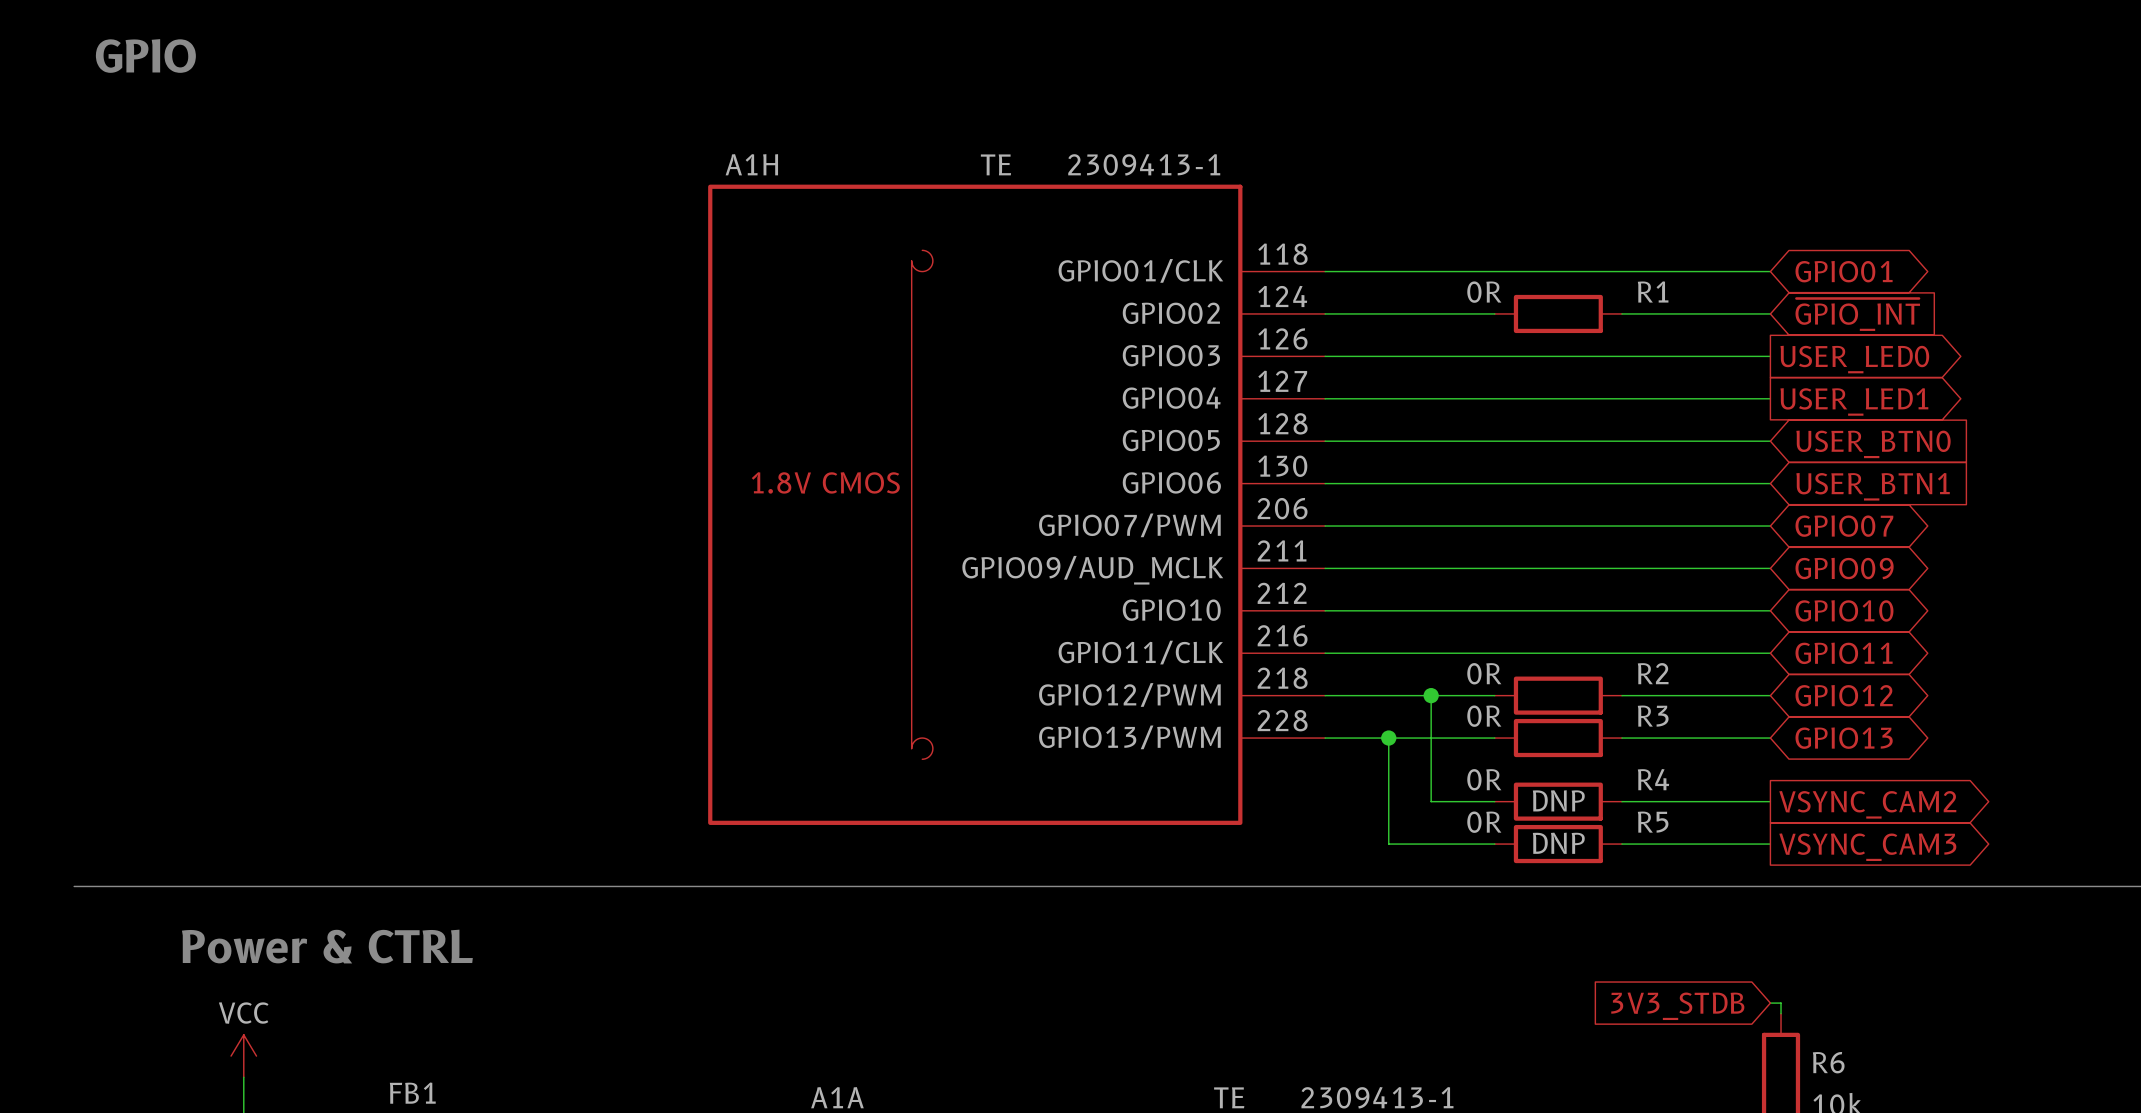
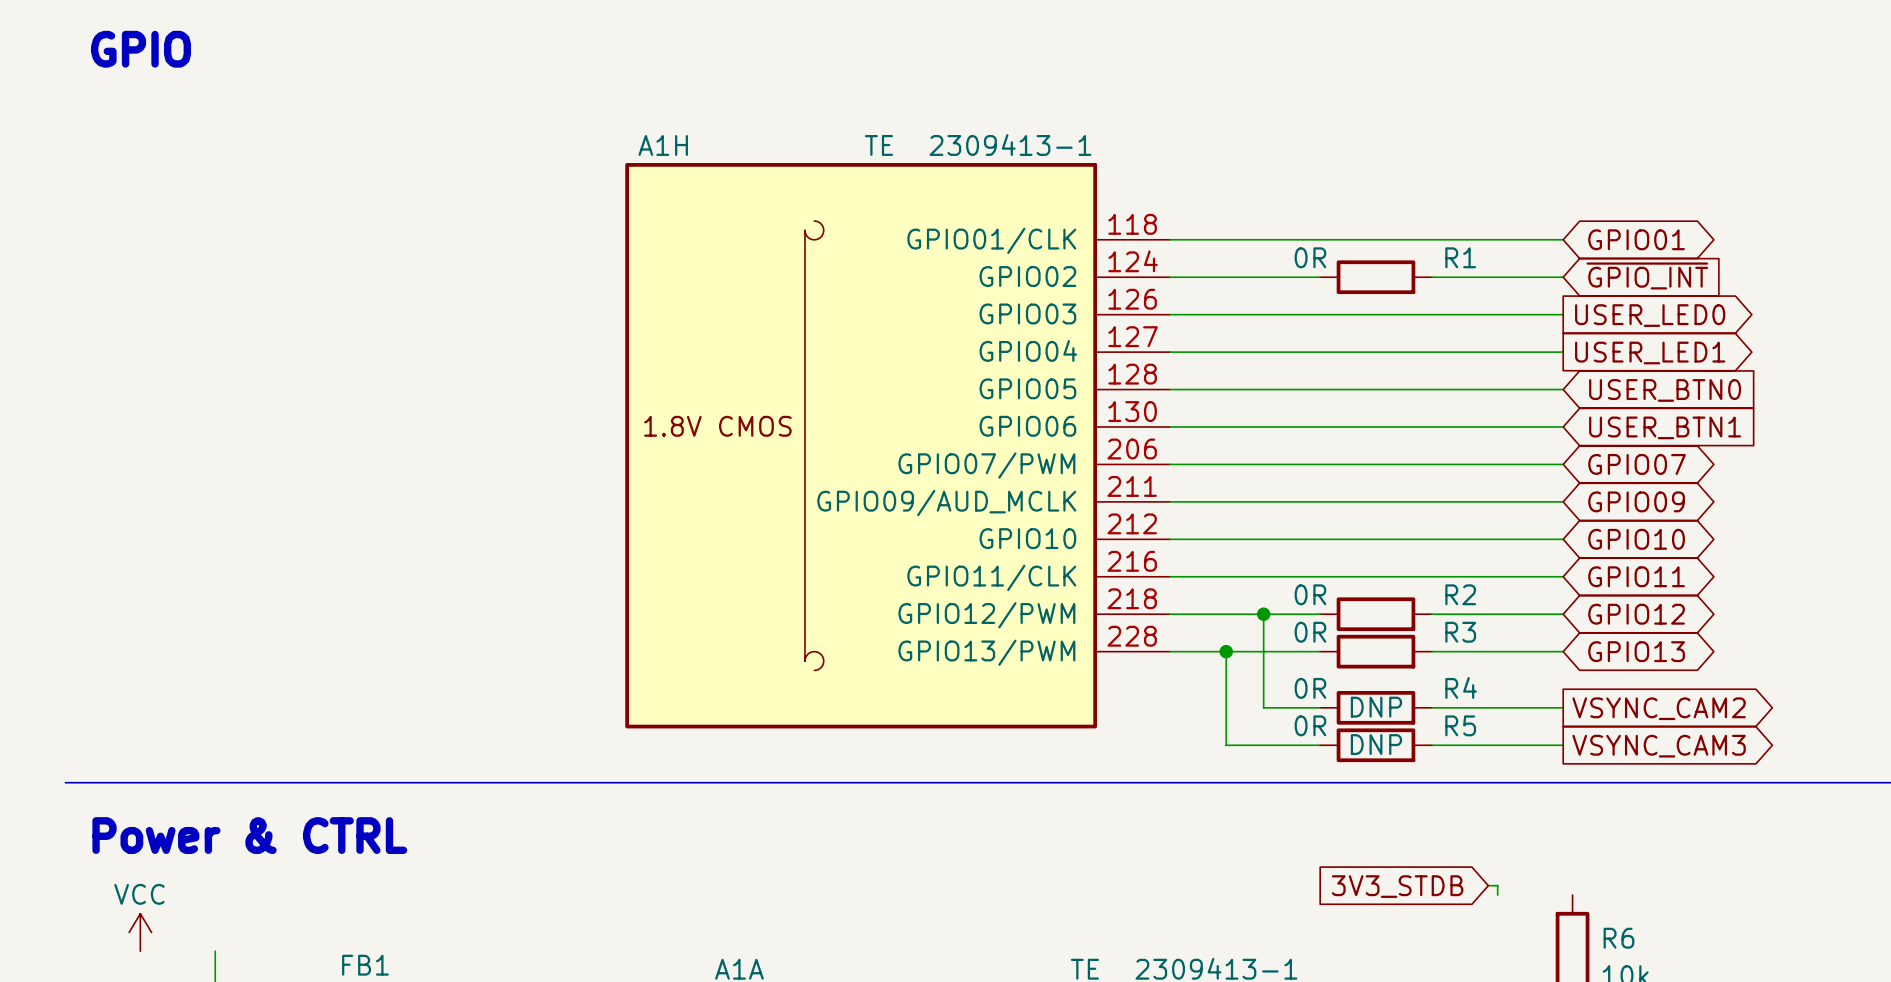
text position: Power & CTRL (327, 946) -> Power & CTRL (249, 835)
wire: (1770, 1003) (1781, 1003) (1781, 1013) -> (1488, 885) (1497, 885) (1497, 895)
global label position: 3V3_STDB (1677, 1006) -> 3V3_STDB (1397, 886)
power symbol position: VCC (243, 1056) -> VCC (140, 932)

